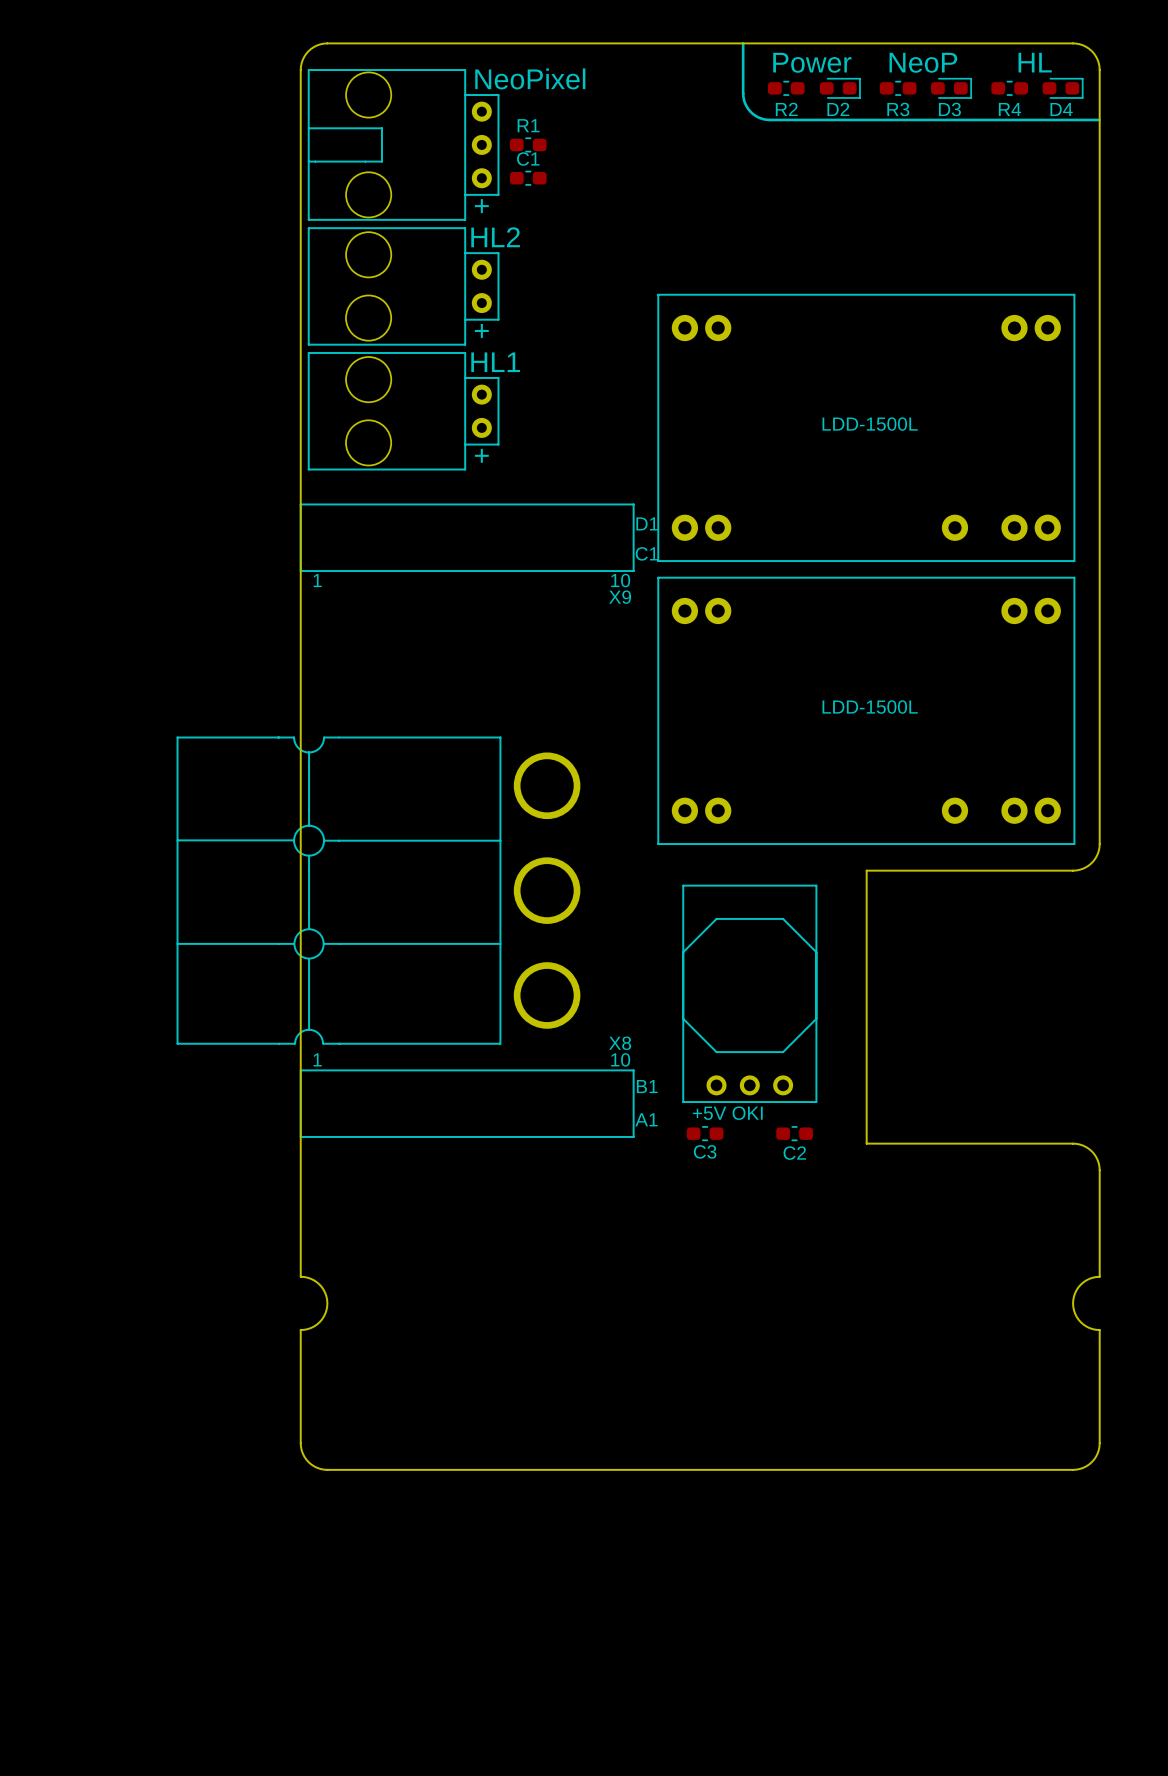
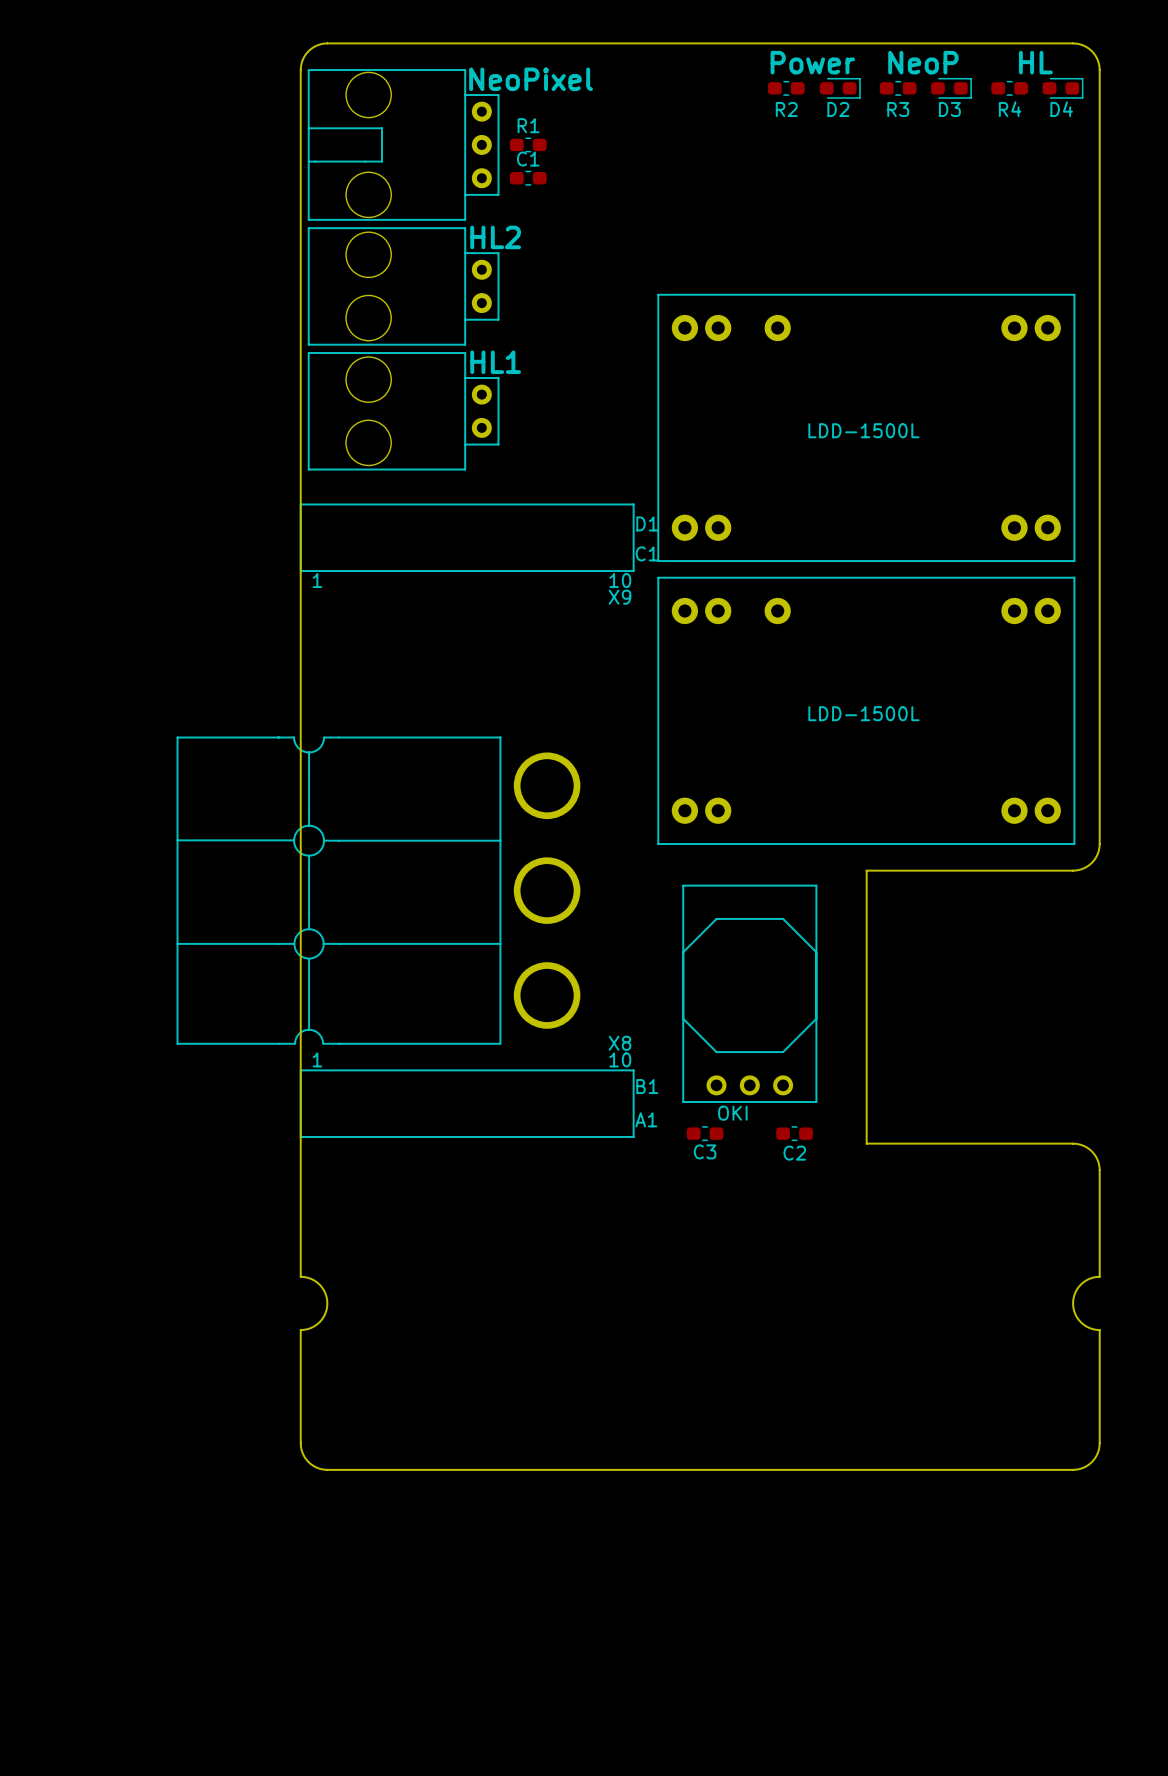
line: (743, 43) (744, 100) (750, 112) (762, 119) (1099, 119) -> none
text: + (481, 206) -> none
text: + (481, 330) -> none
part rotation: 0° (866, 427) -> 180° (866, 427)
text: + (481, 455) -> none
part rotation: 0° (866, 710) -> 180° (866, 710)
part value: +5V OKI (727, 1113) -> OKI (732, 1113)

